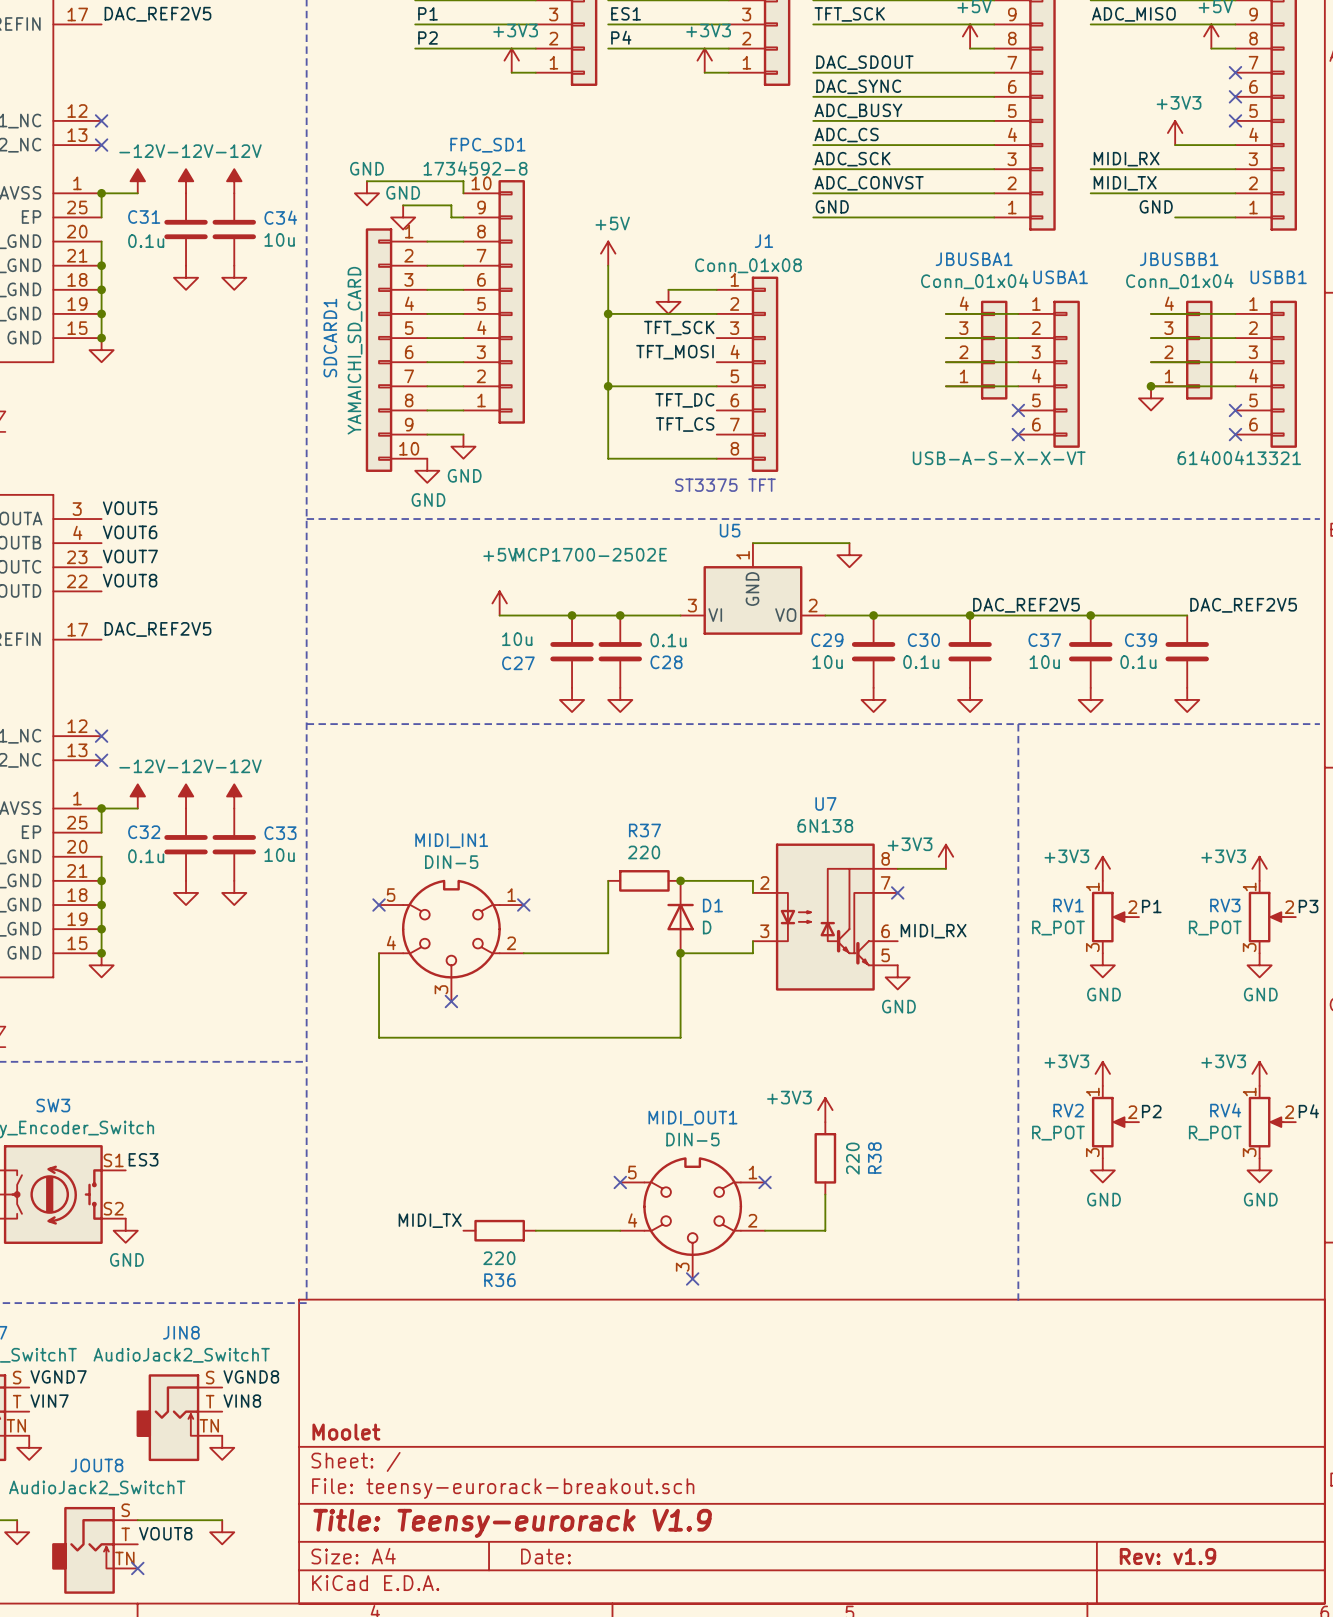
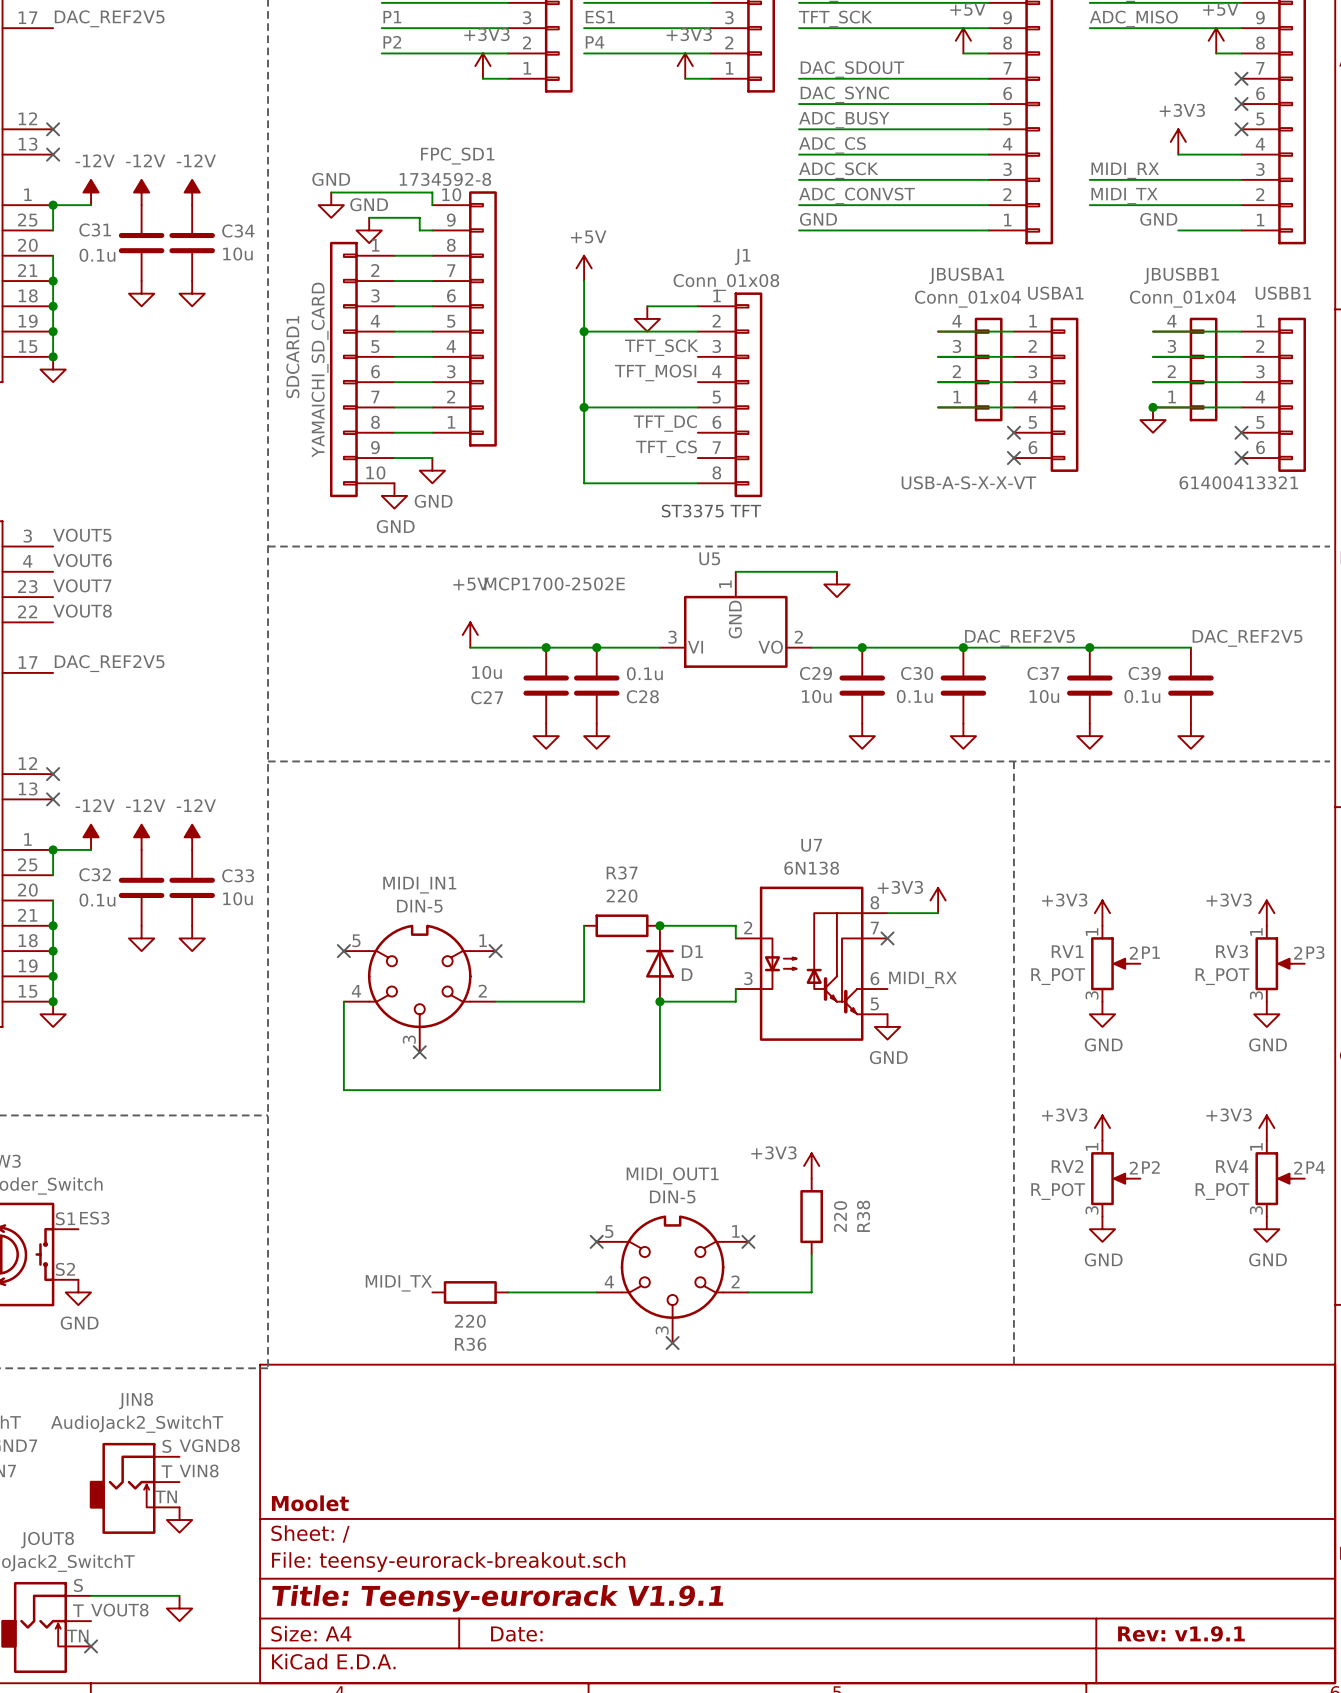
title block: Title: Teensy-eurorack V1.9 (512, 1523) -> Title: Teensy-eurorack V1.9.1 (497, 1598)
title block: Rev: v1.9 (1167, 1556) -> Rev: v1.9.1 (1181, 1633)

